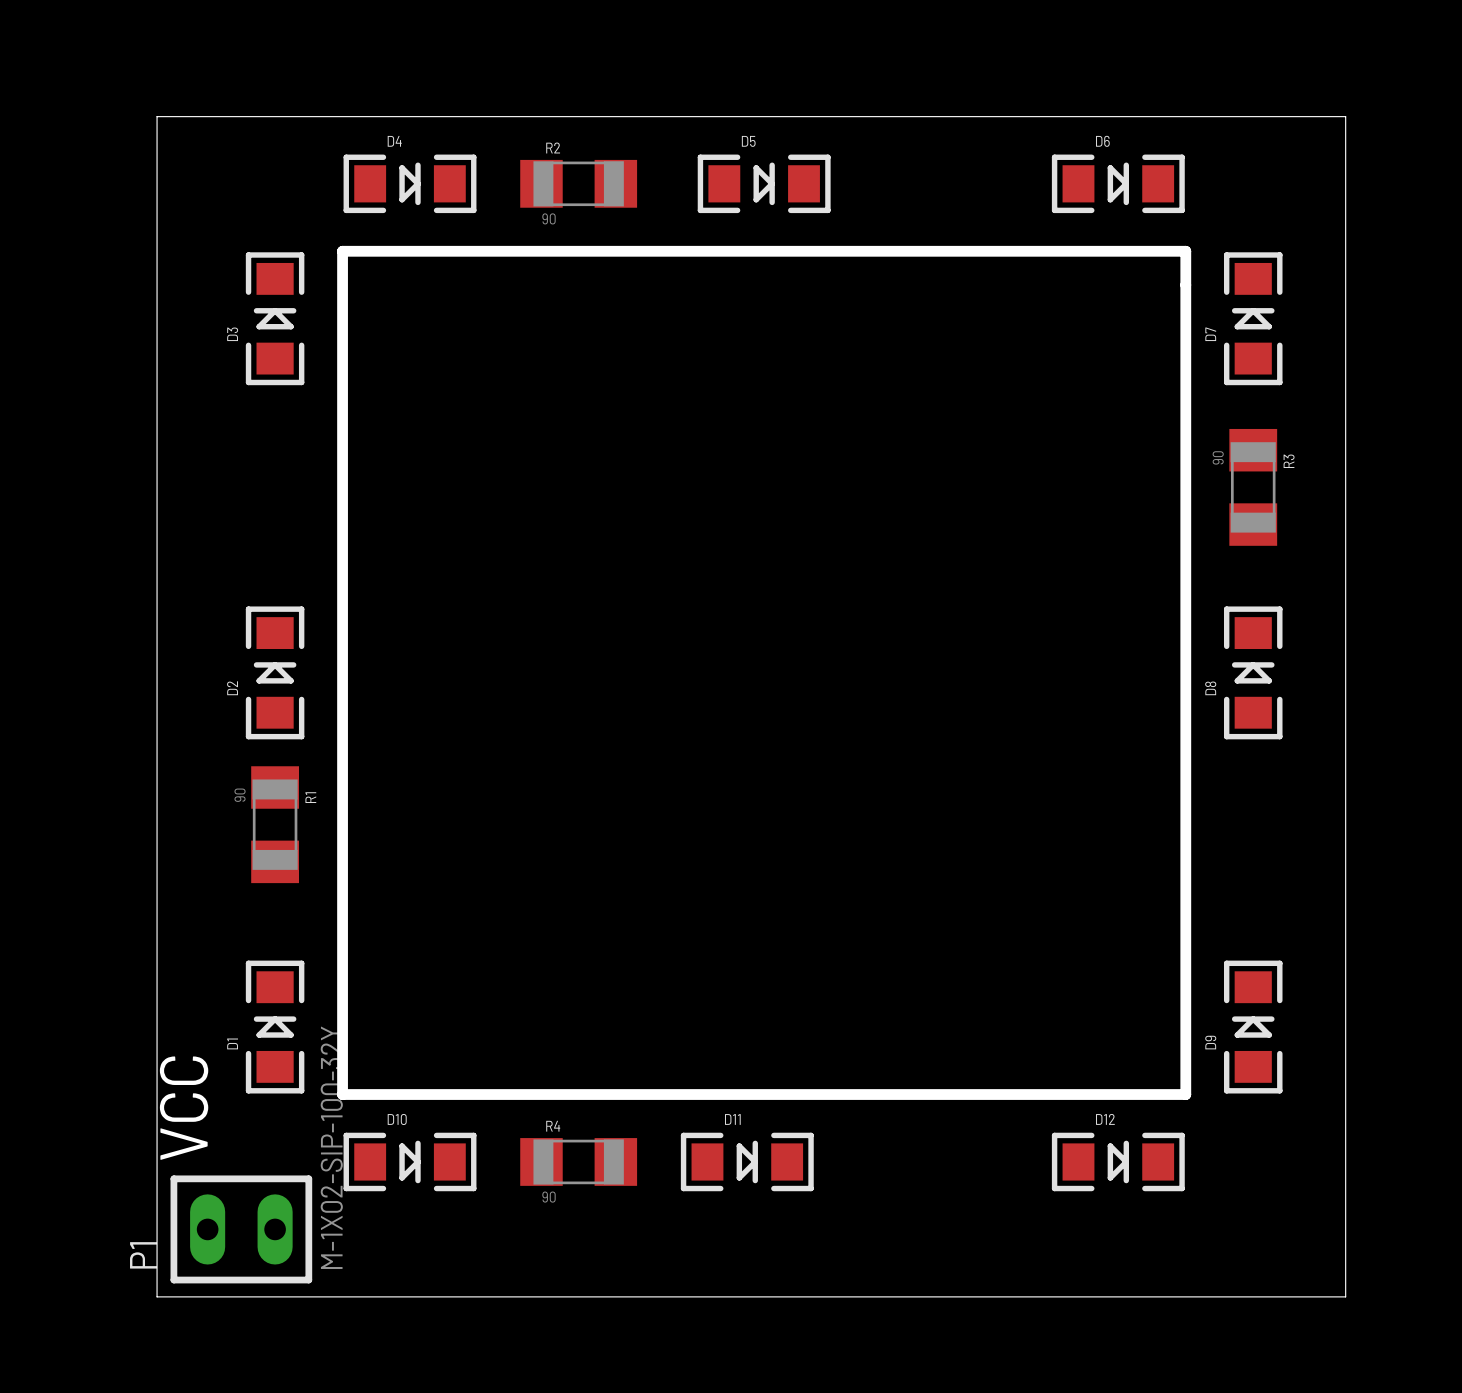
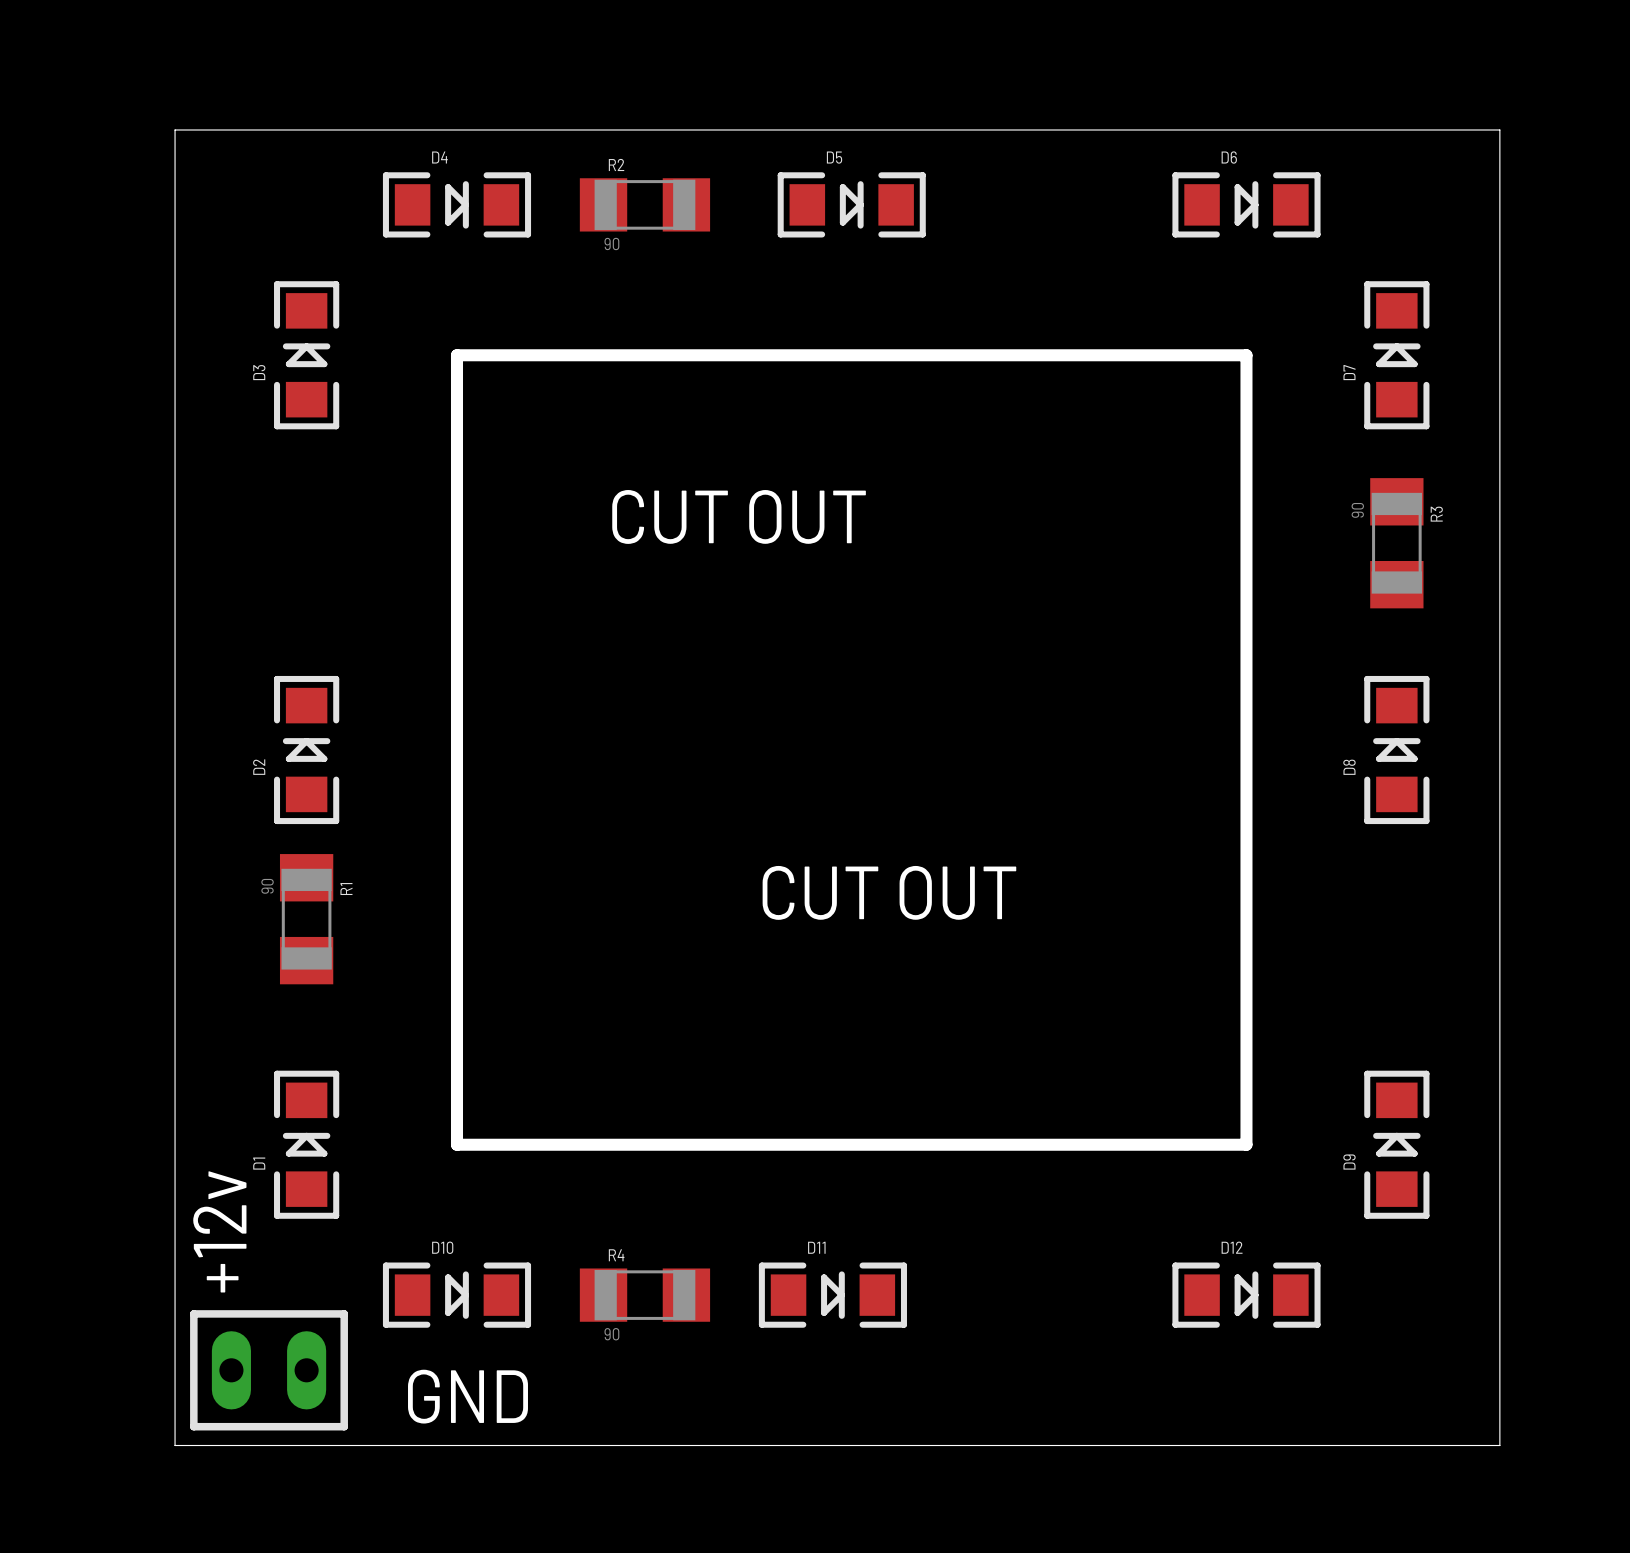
board edge: (342, 251) (342, 1094) (1185, 1094) (1185, 251) (342, 251) -> (456, 355) (456, 1144) (1246, 1144) (1246, 355) (456, 355)
text: none -> CUT OUT (739, 516)
text: none -> CUT OUT (889, 892)
text: VCC (184, 1108) -> +12v (219, 1231)
P1 value: M-1X02-SIP-100-32Y (331, 1147) -> none
text: none -> GND (468, 1396)
P1 name: P1 (143, 1255) -> none

